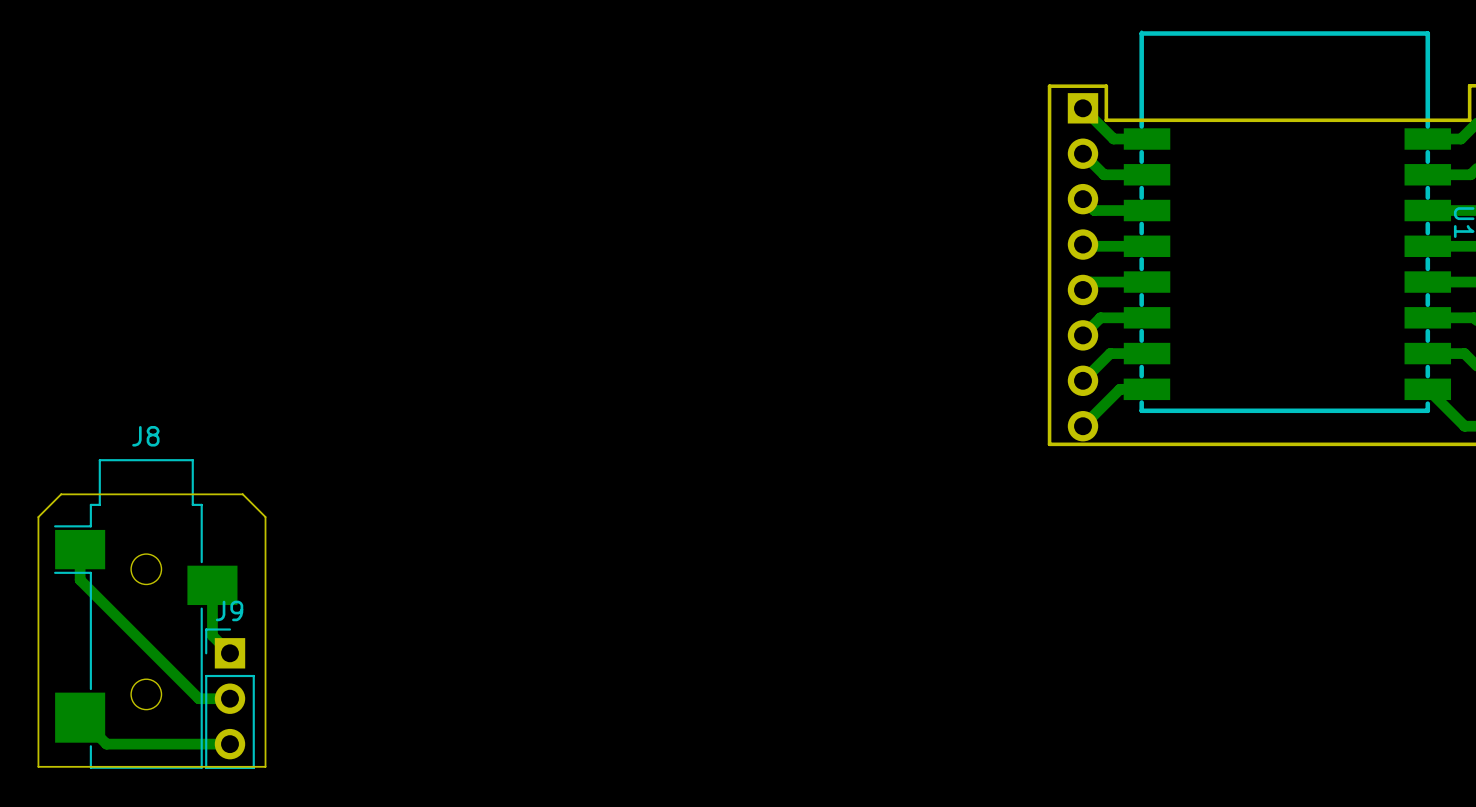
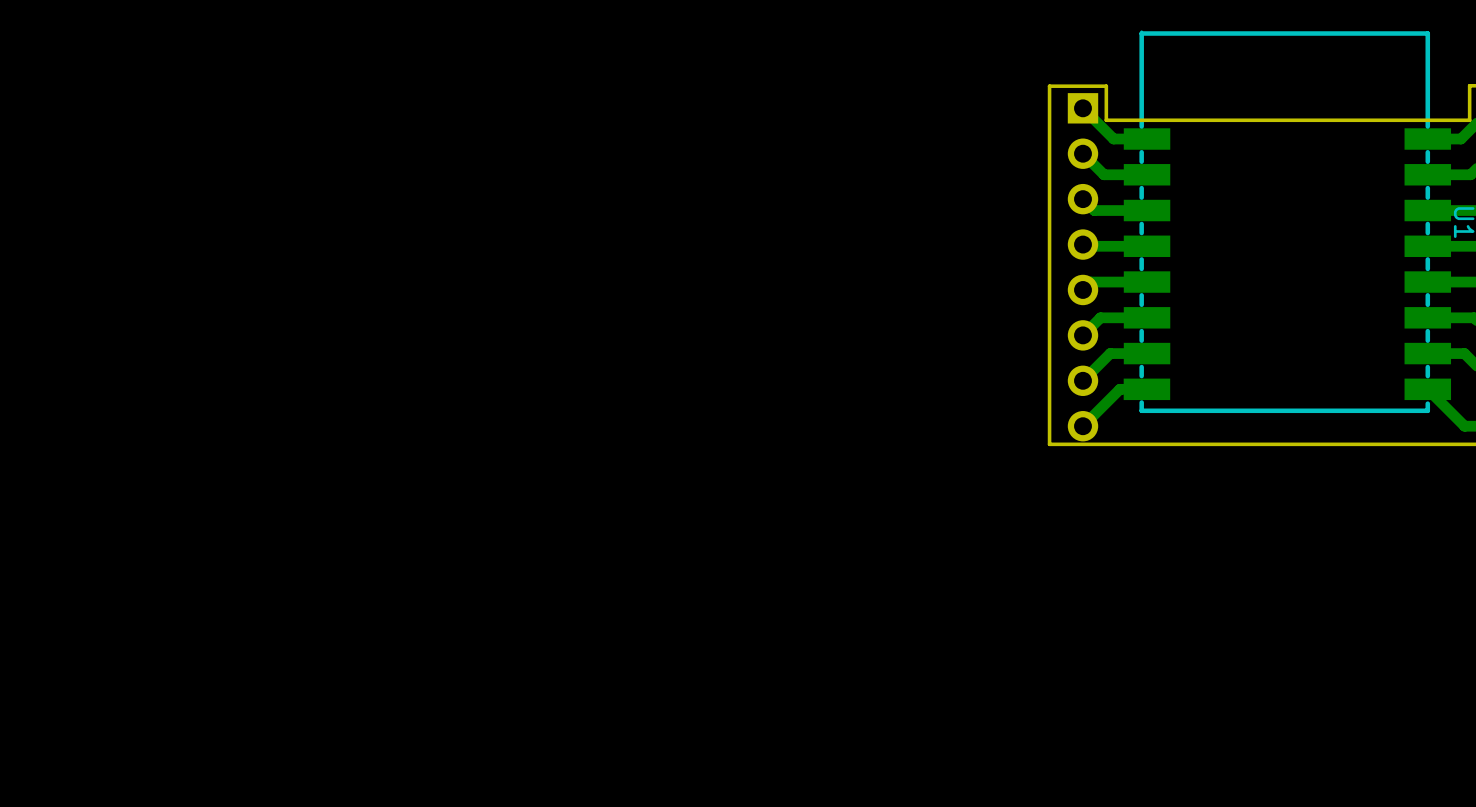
board edge: (242, 494) (61, 494) (38, 517) (38, 766) (265, 766) (265, 517) (242, 494) -> none
bottom track: (80, 549) (80, 579) (198, 698) (229, 698) -> none
bottom track: (212, 585) (212, 635) (229, 653) -> none
J8: (145, 613) -> none
J9: (229, 698) -> none
bottom track: (80, 717) (106, 744) (229, 744) -> none

